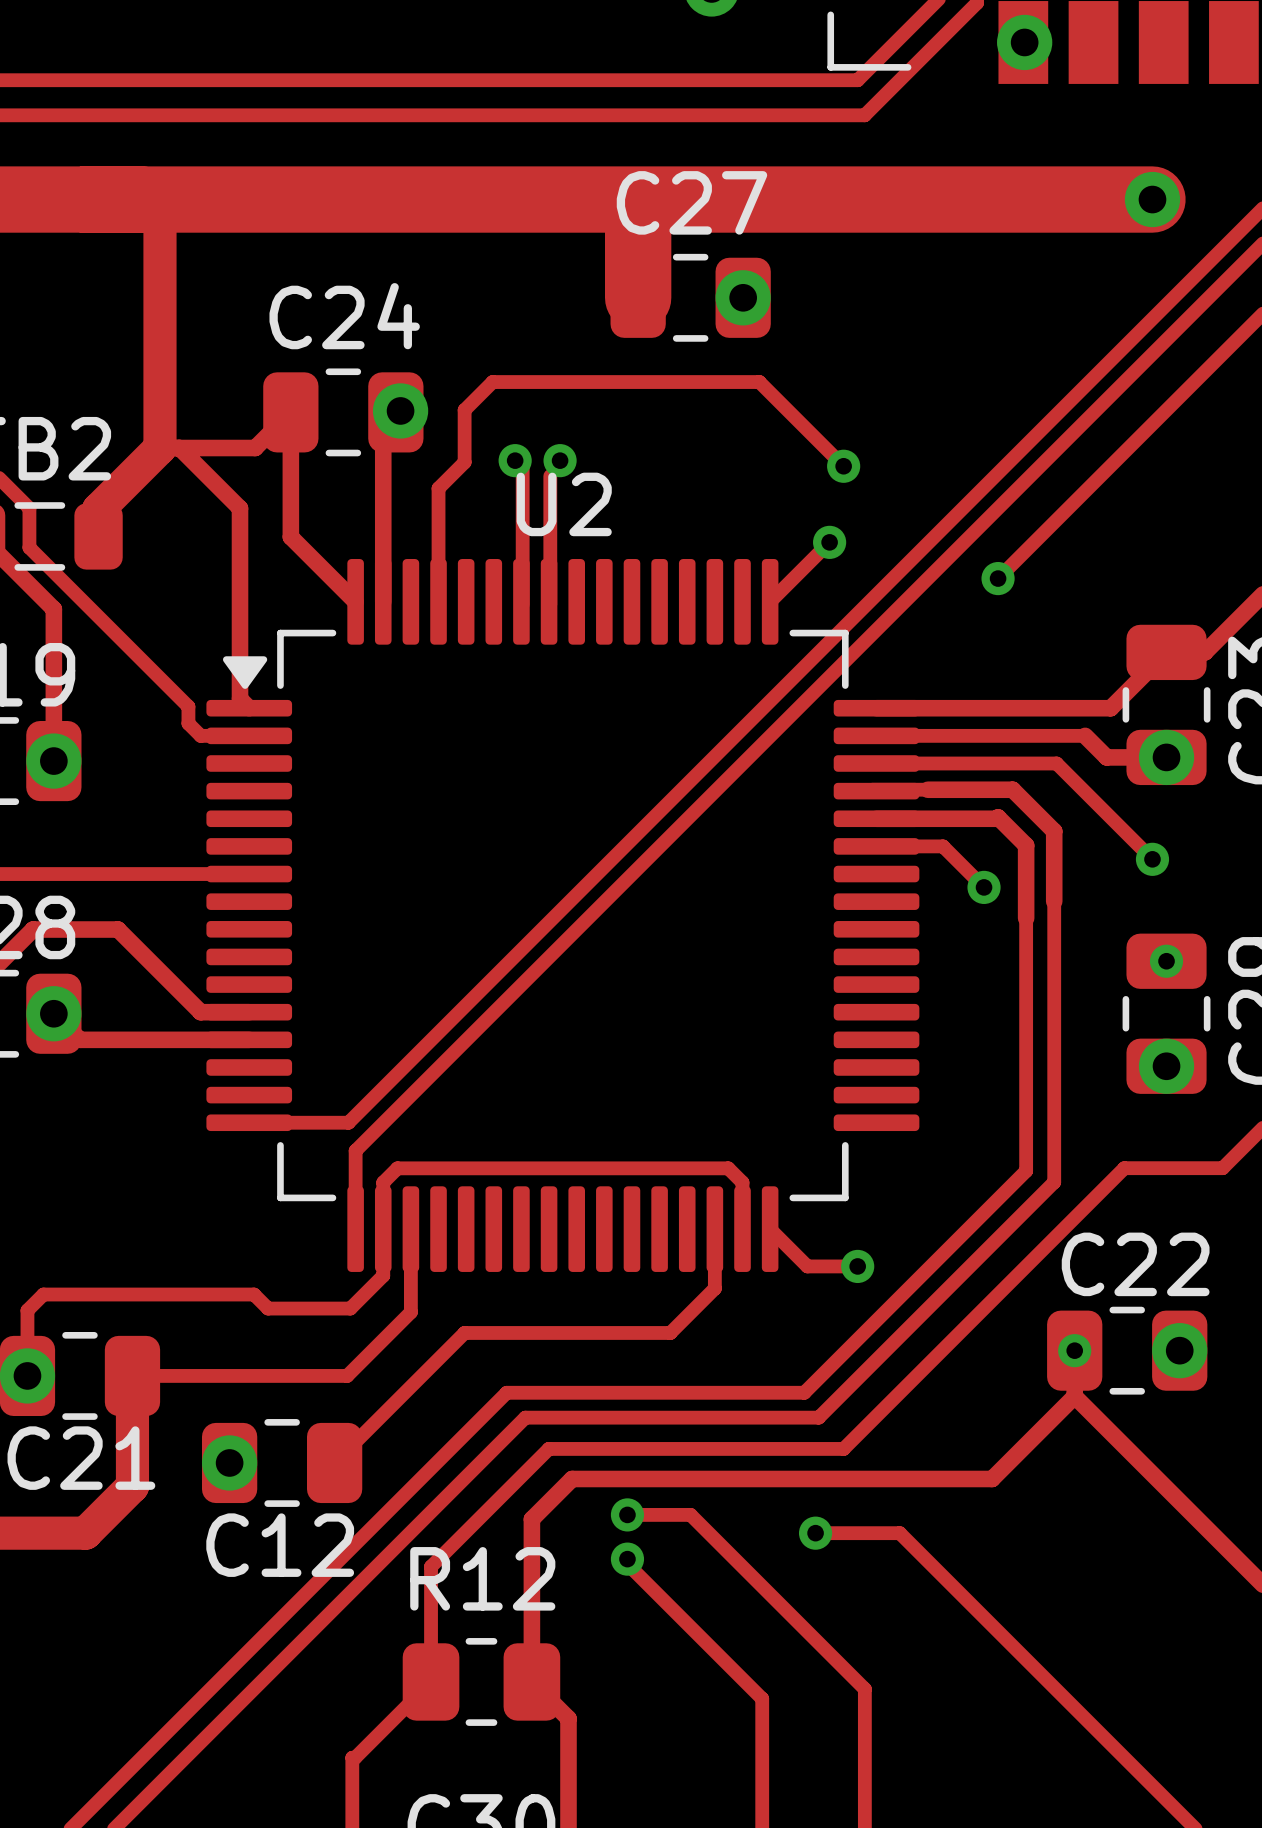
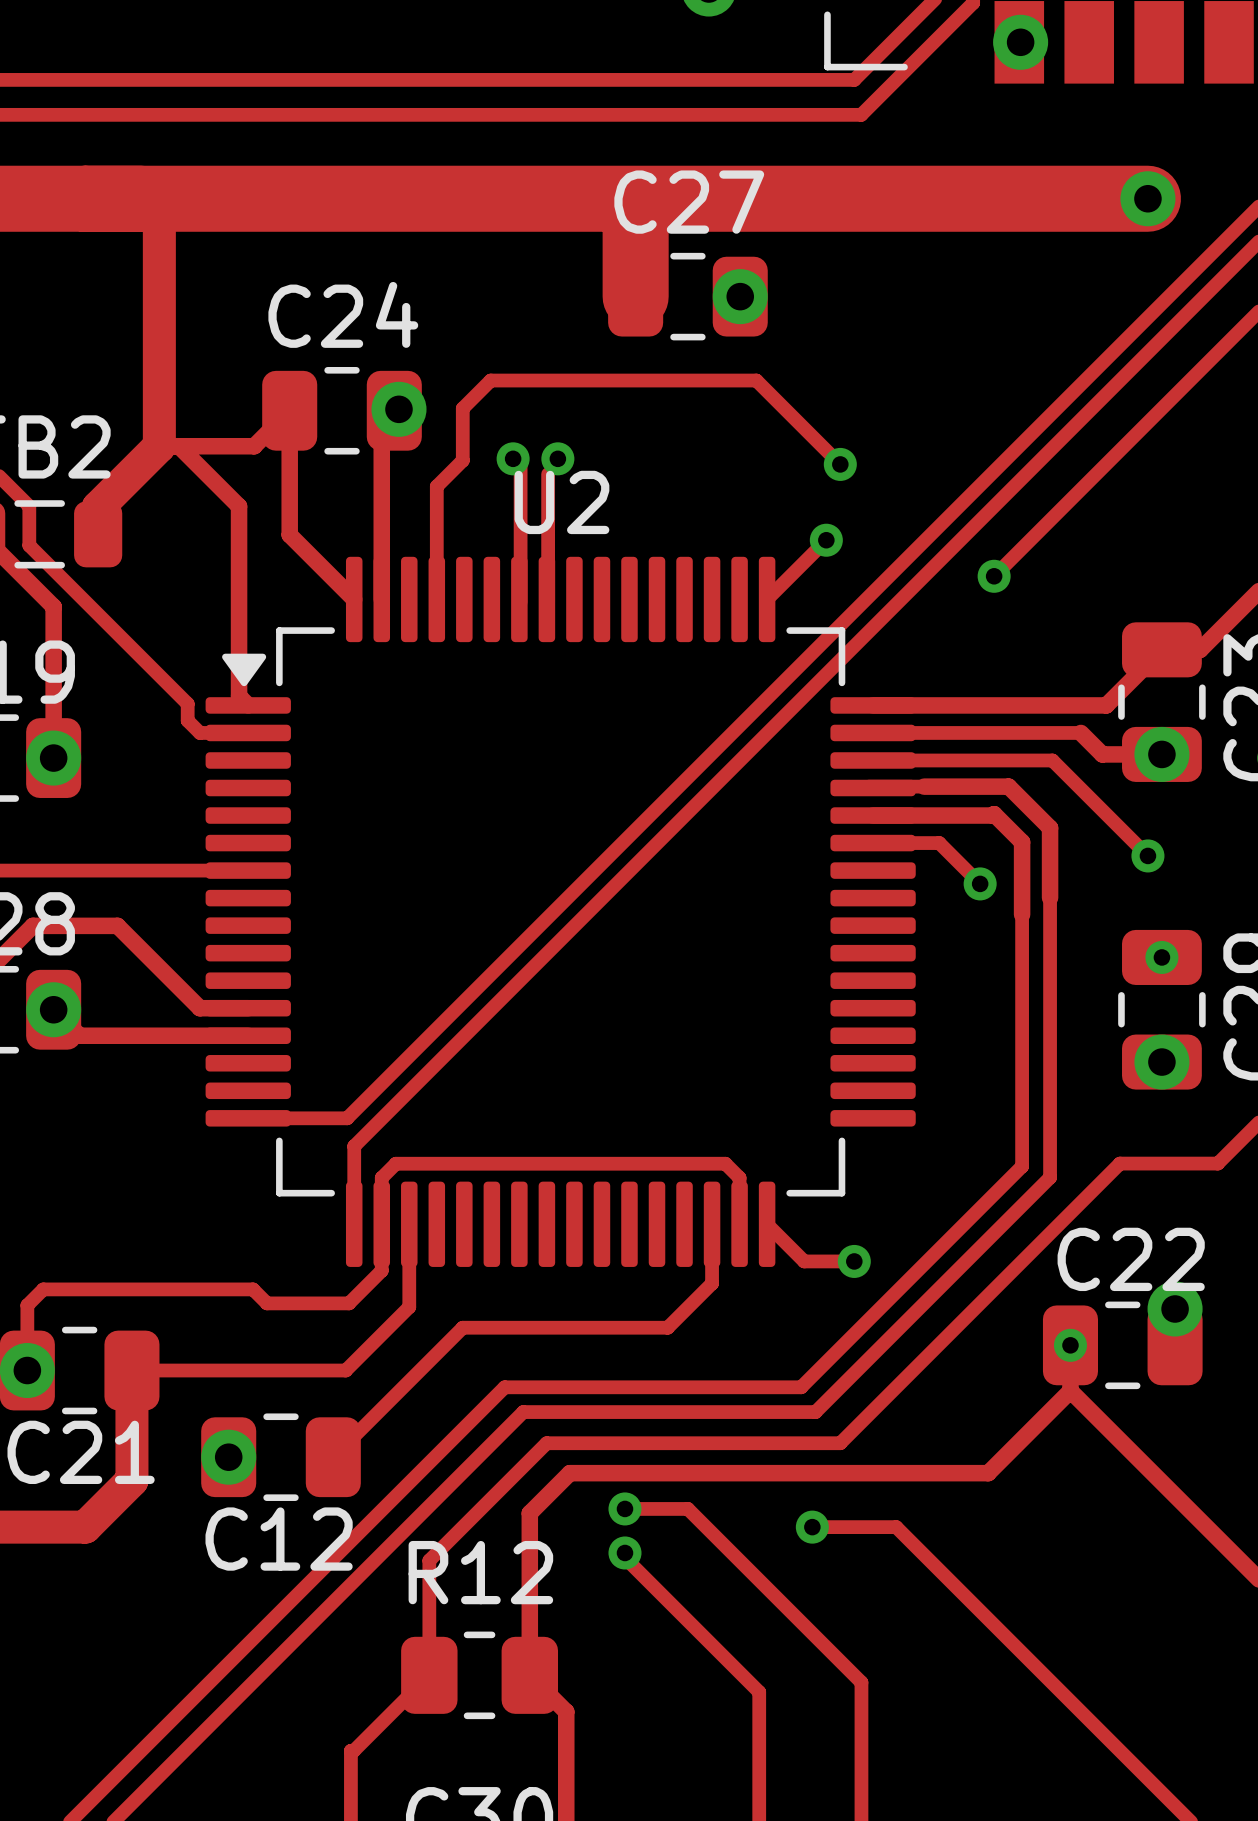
via position: (1179, 1350) -> (1175, 1308)

